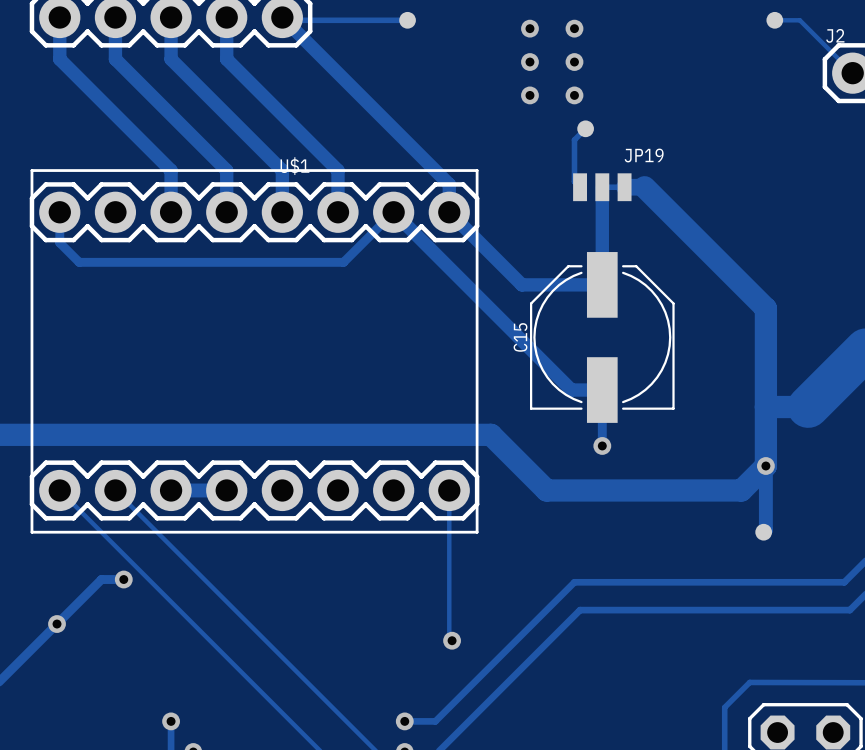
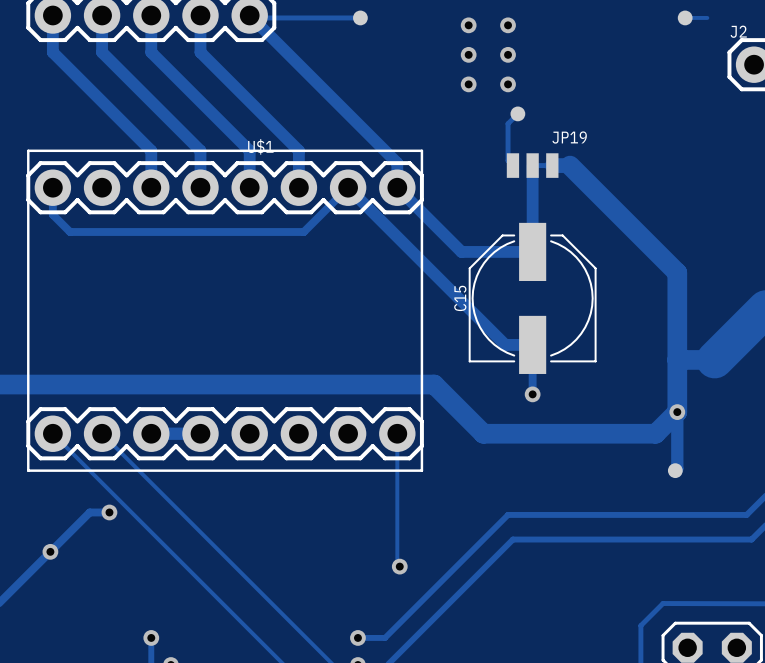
track: (799, 20) (852, 73) -> none

